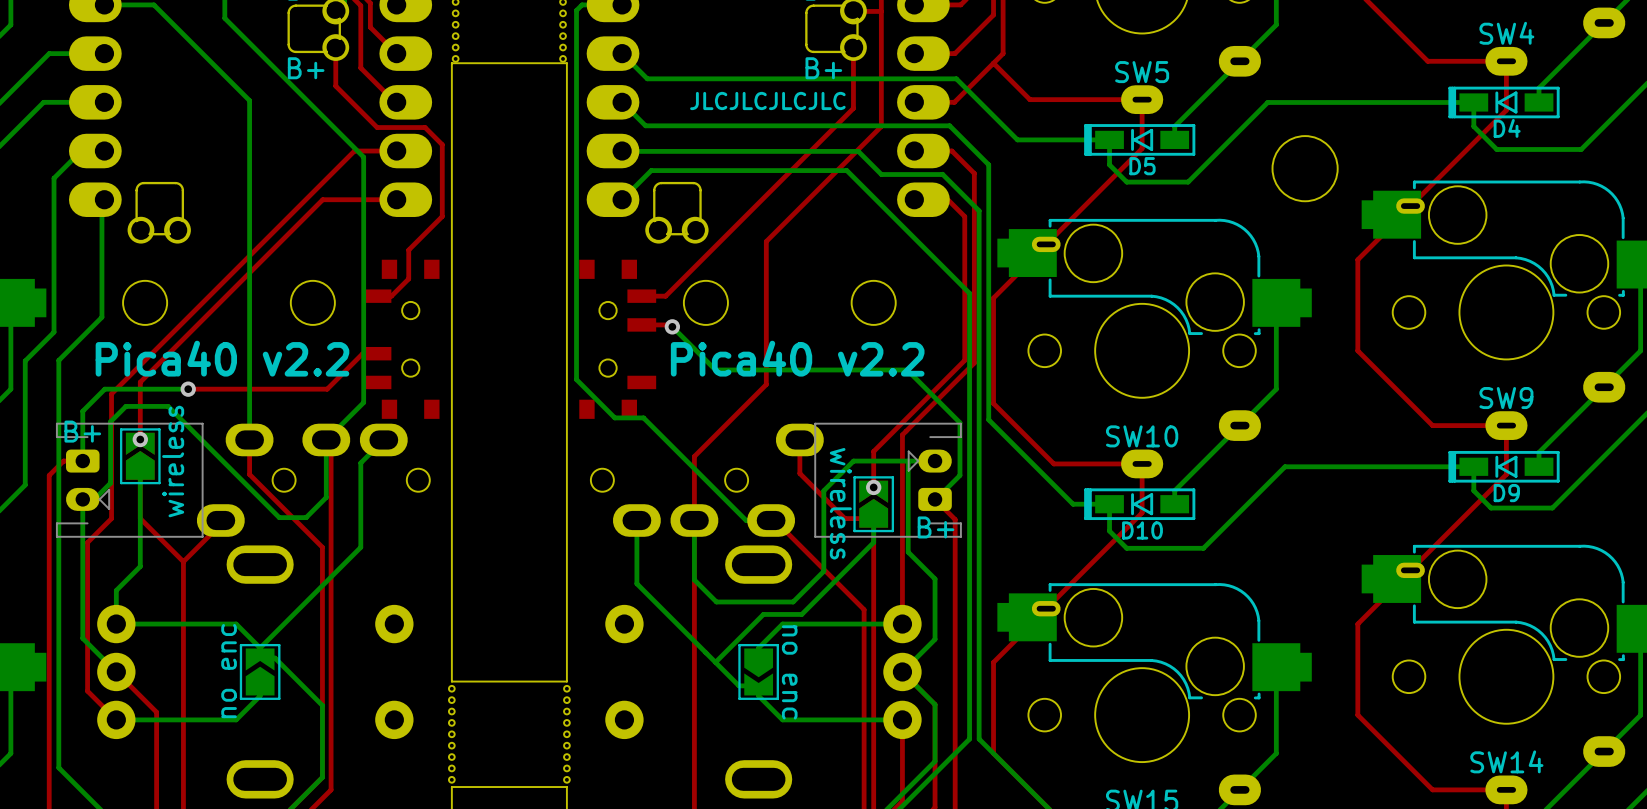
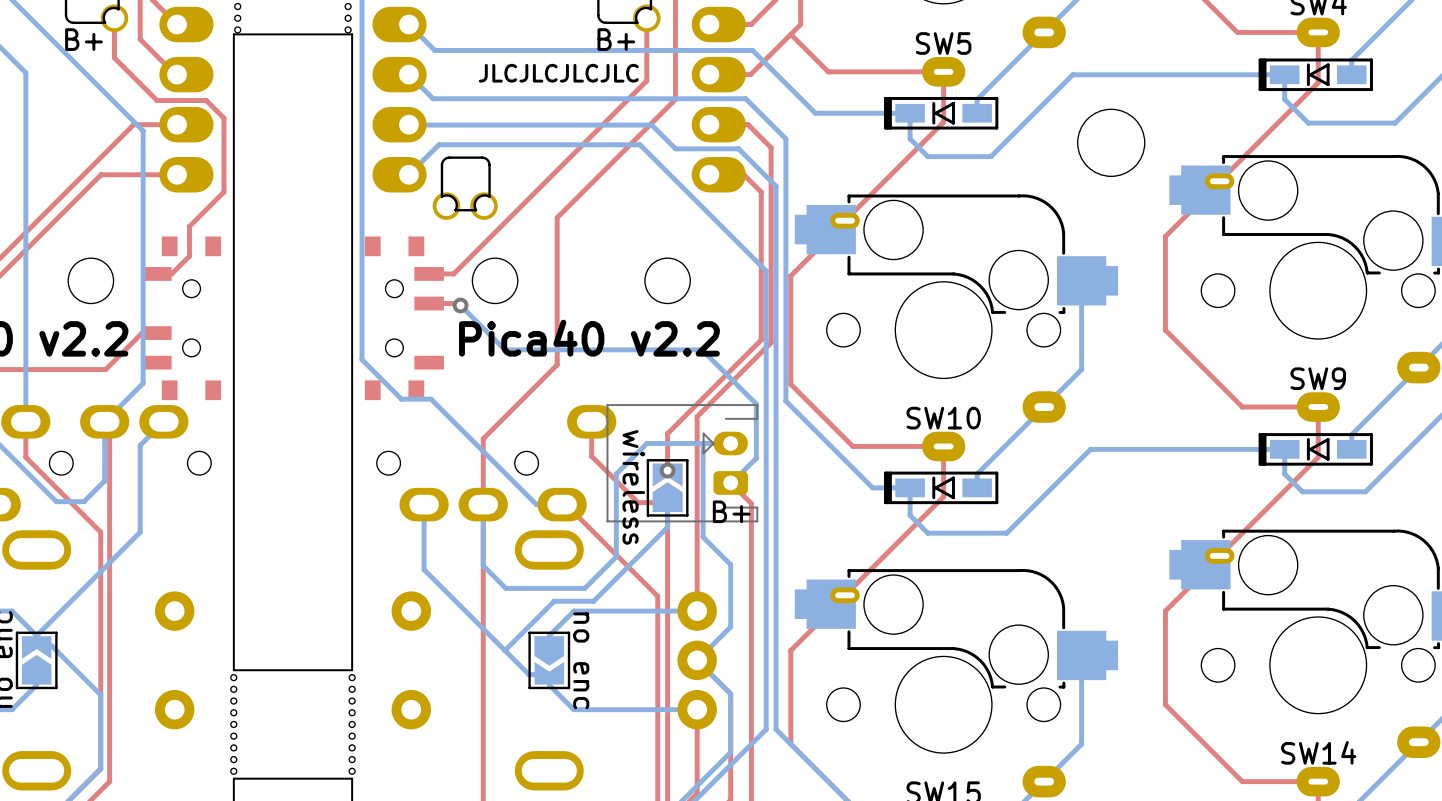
D4 name: D4 (1507, 128) -> none
D5 name: D5 (1142, 166) -> none
D9 name: D9 (1506, 493) -> none
D10 name: D10 (1142, 530) -> none

